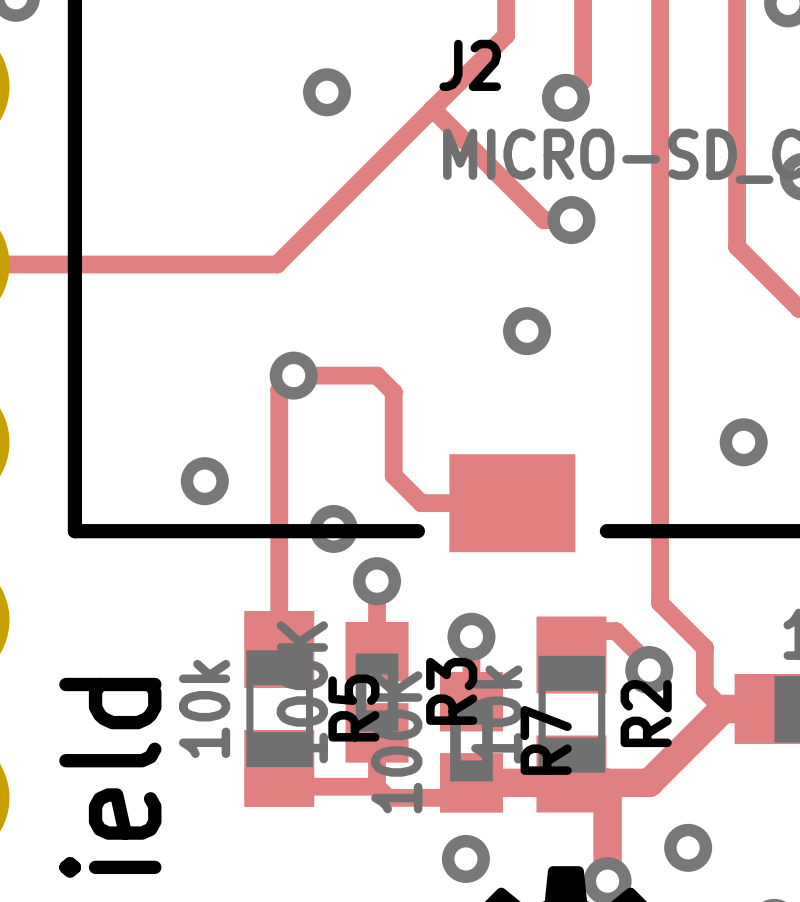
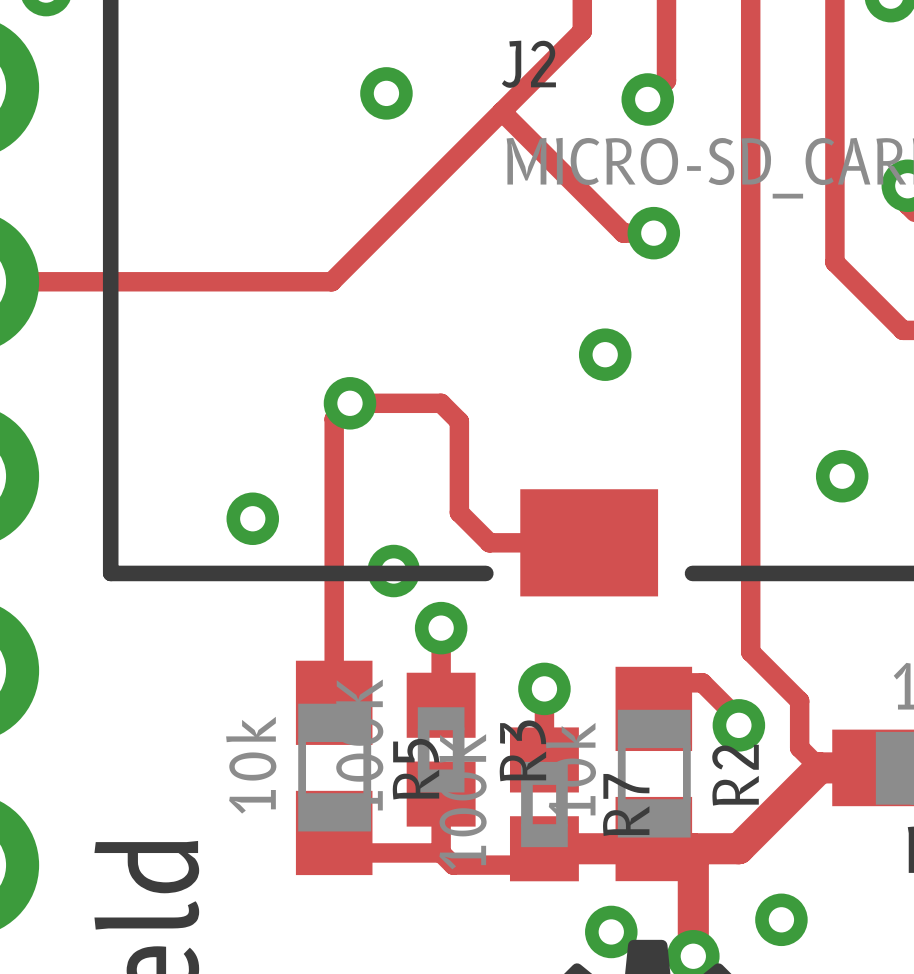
via: (465, 858) -> none
via: none -> (611, 931)

